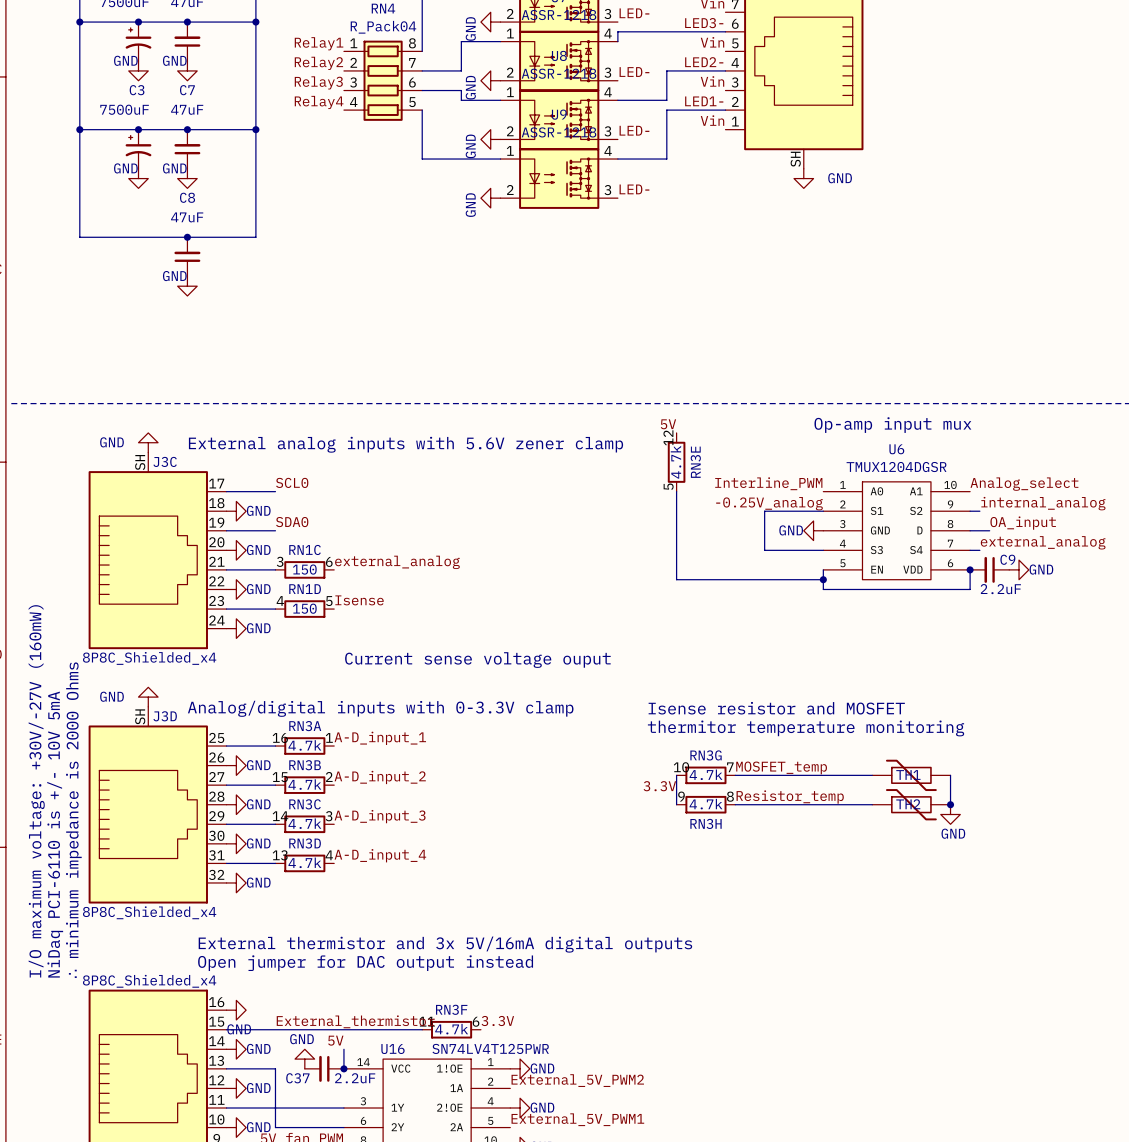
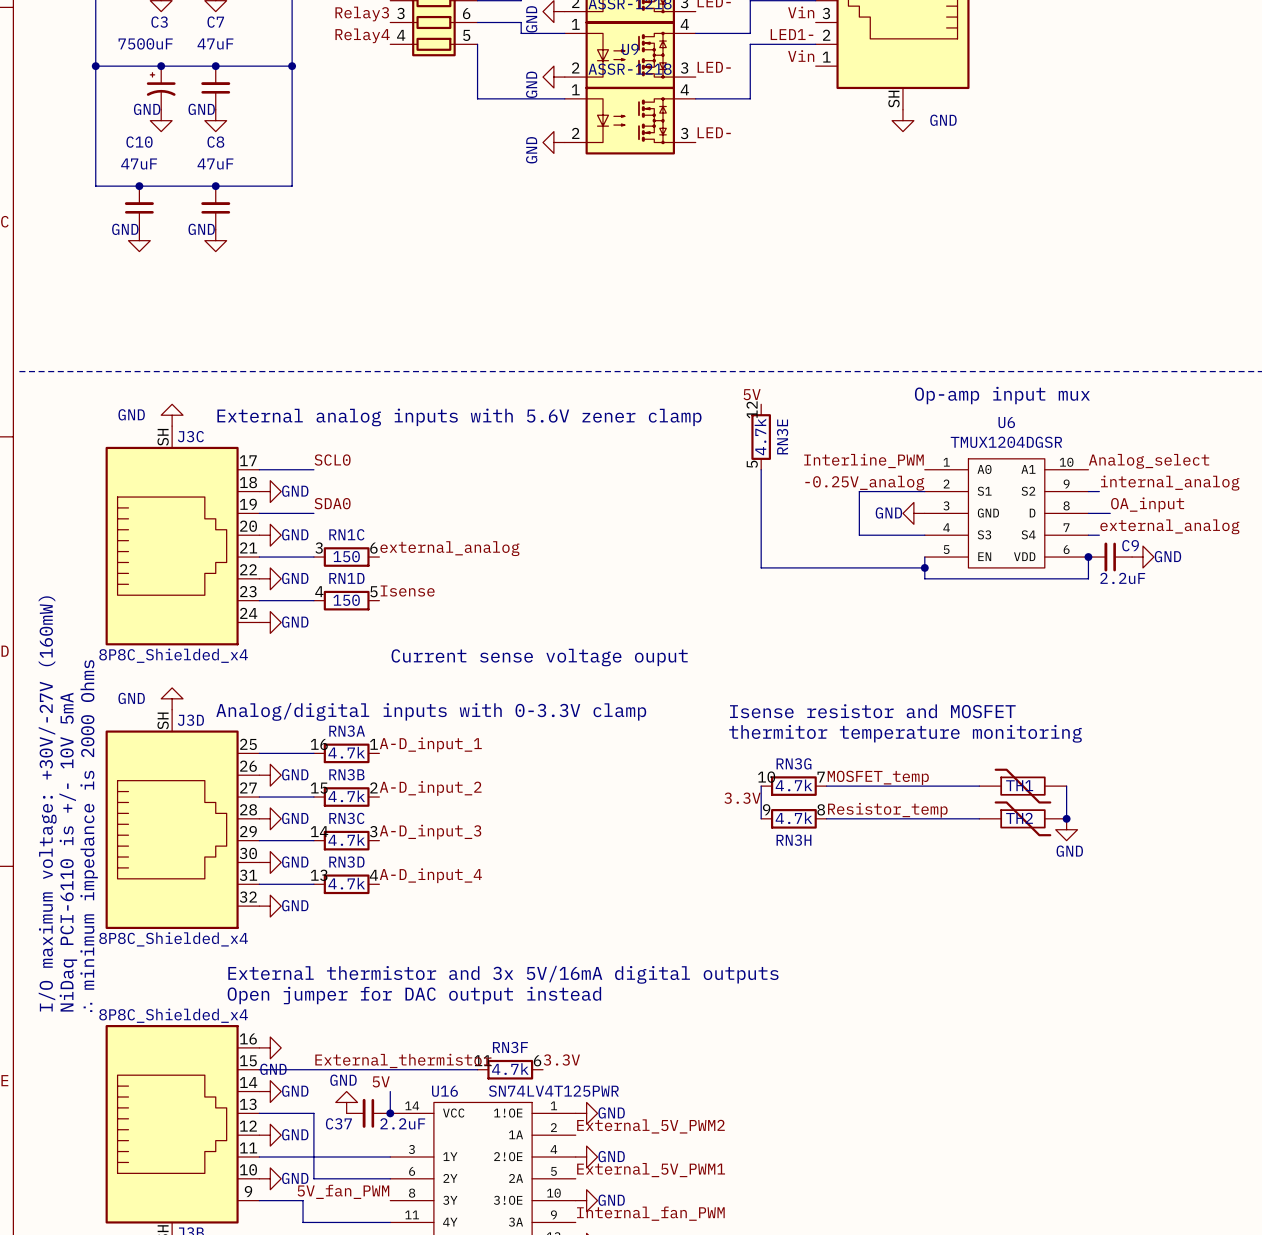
junction: none -> (139, 186)
C10: none -> 47uF (139, 207)
power symbol: none -> GND (139, 240)

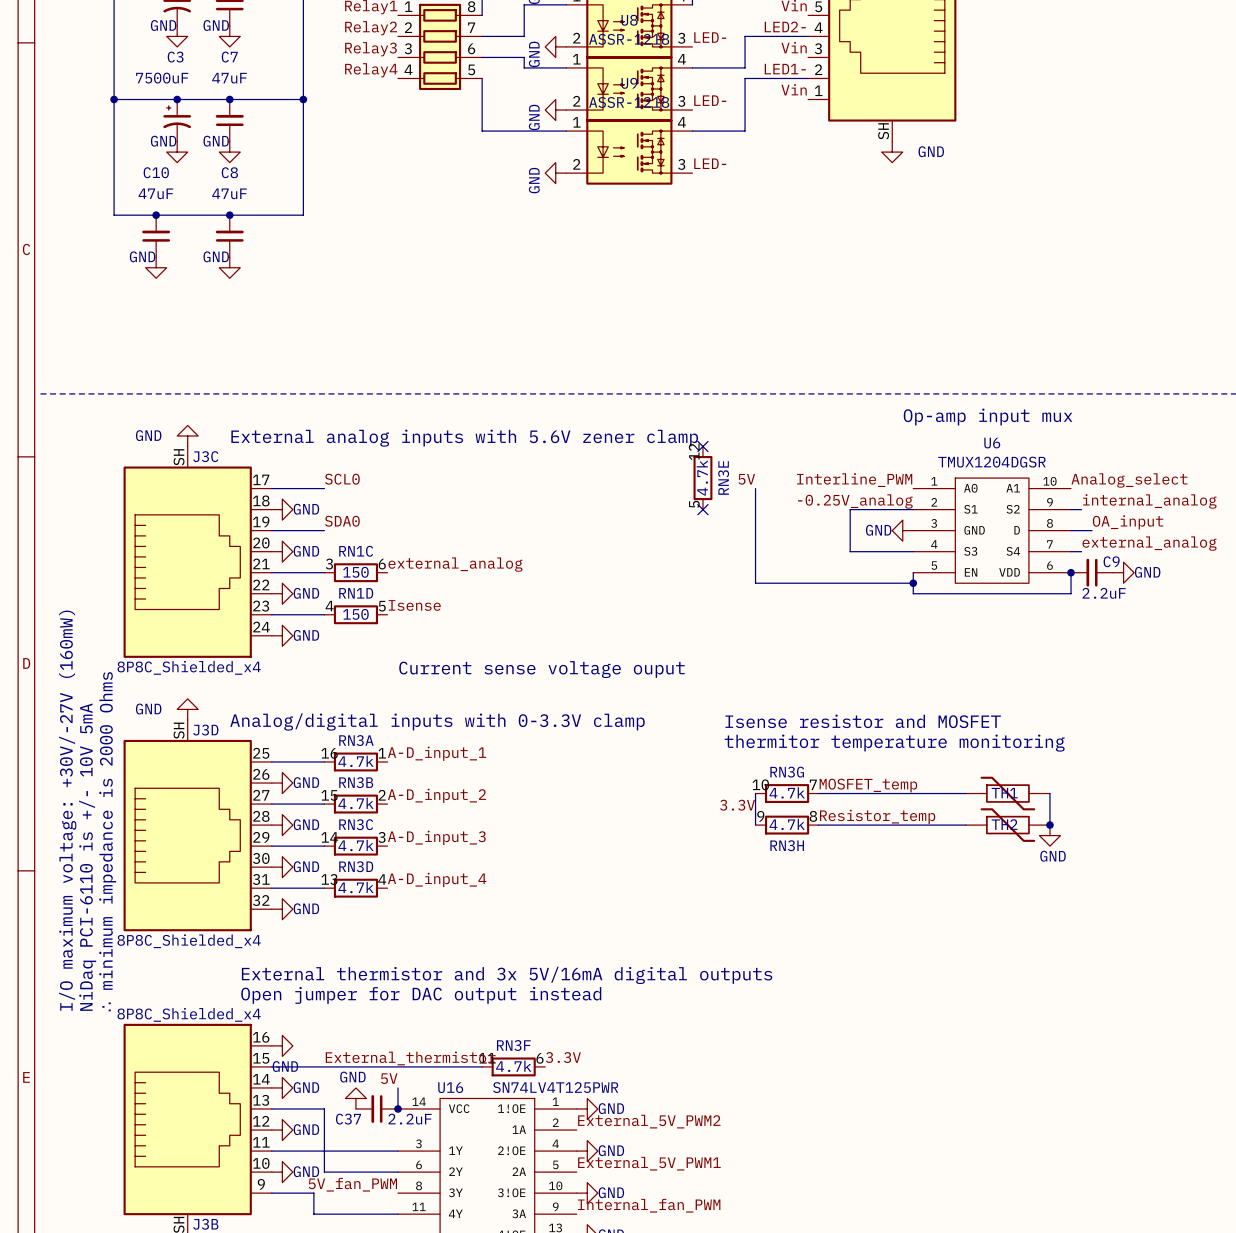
label position: 5V (752, 394) -> 5V (746, 479)
no-connect mark: none -> (702, 446)
RN3E position: (761, 437) -> (702, 478)
no-connect mark: none -> (702, 509)

